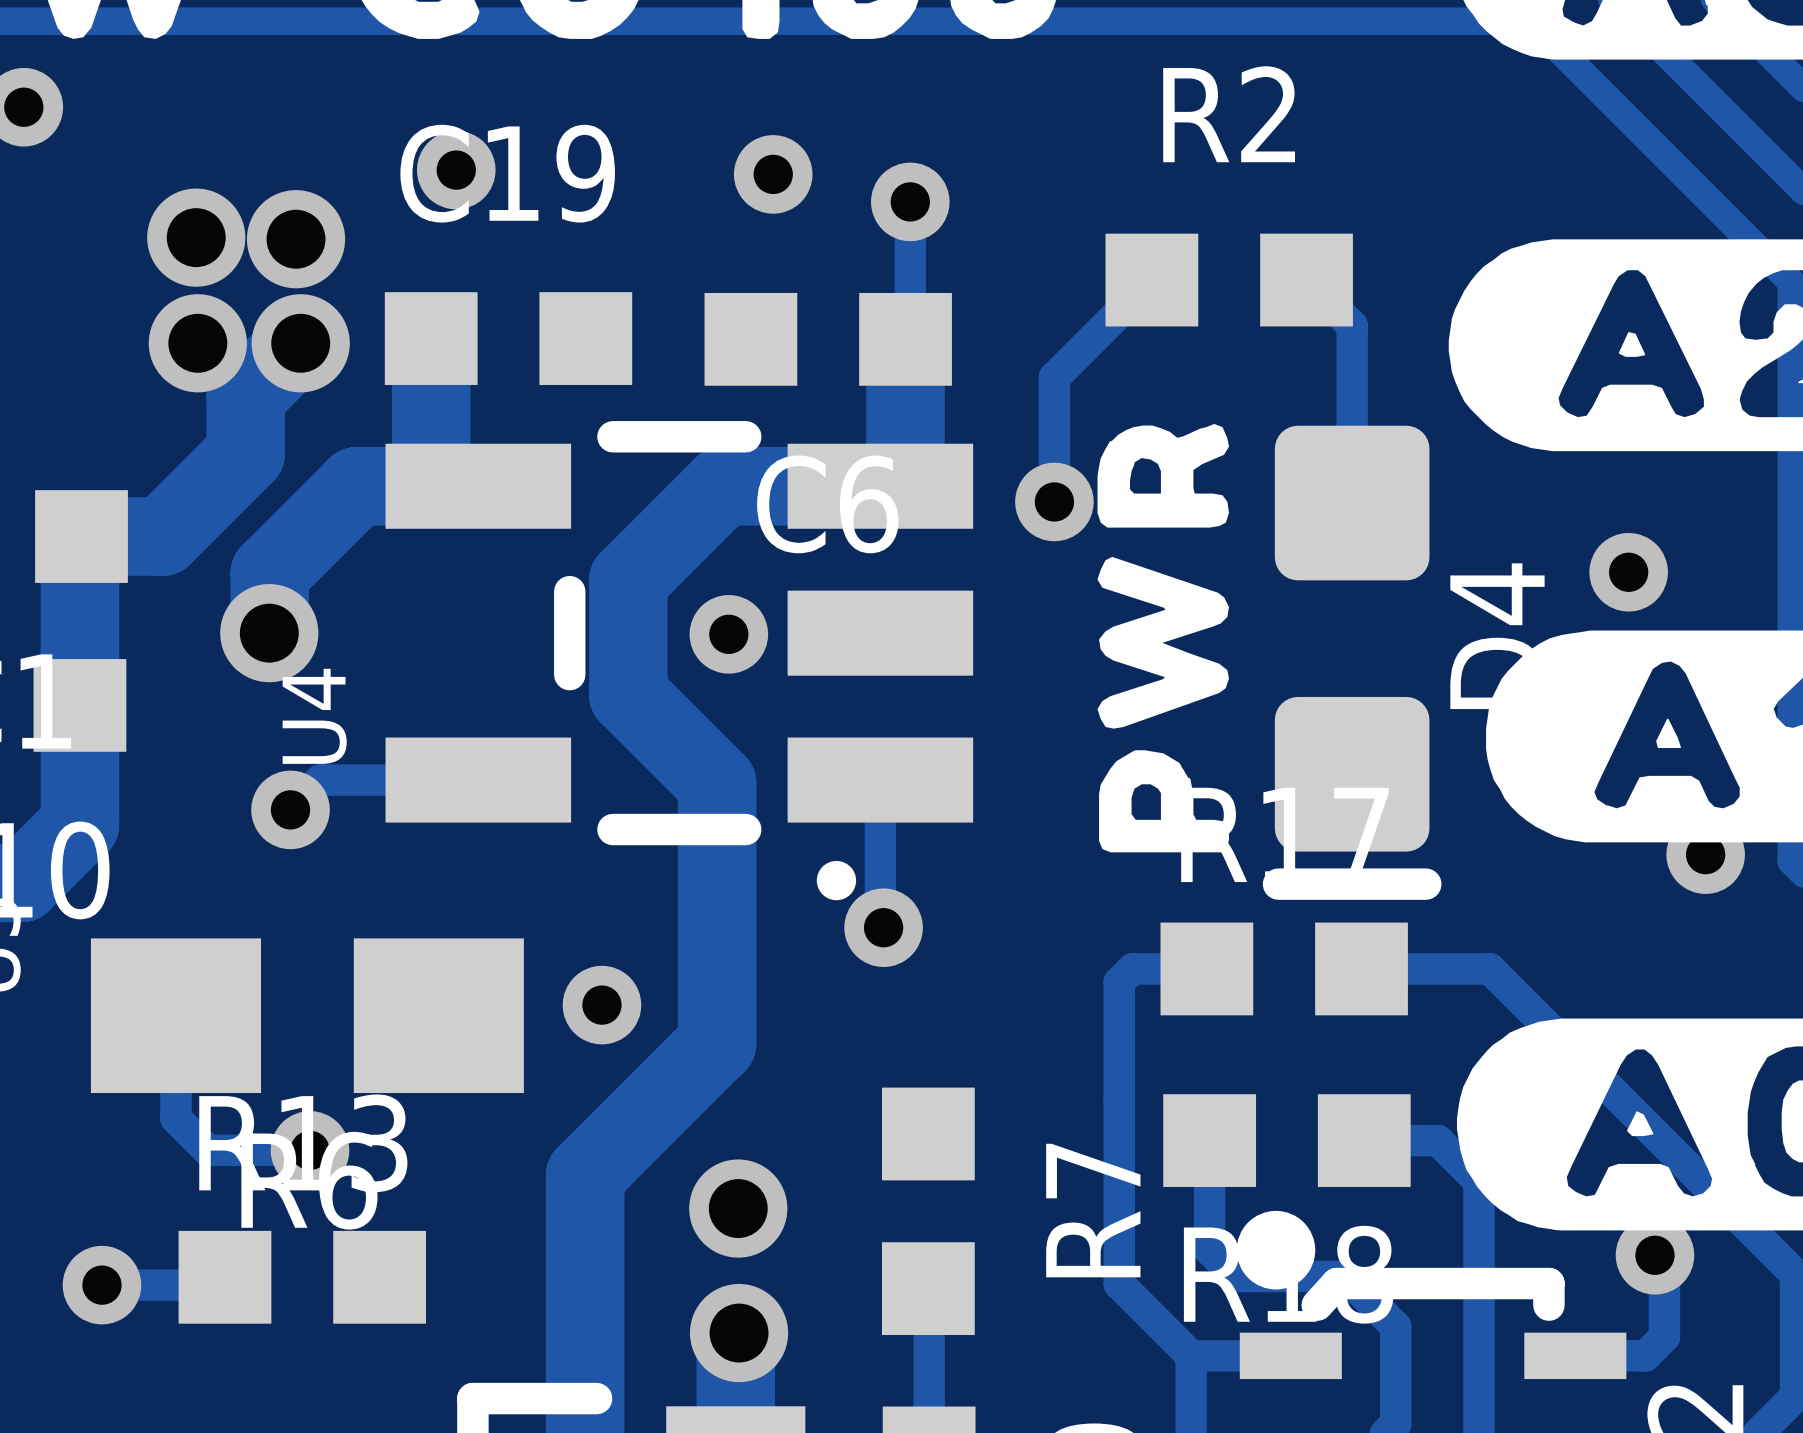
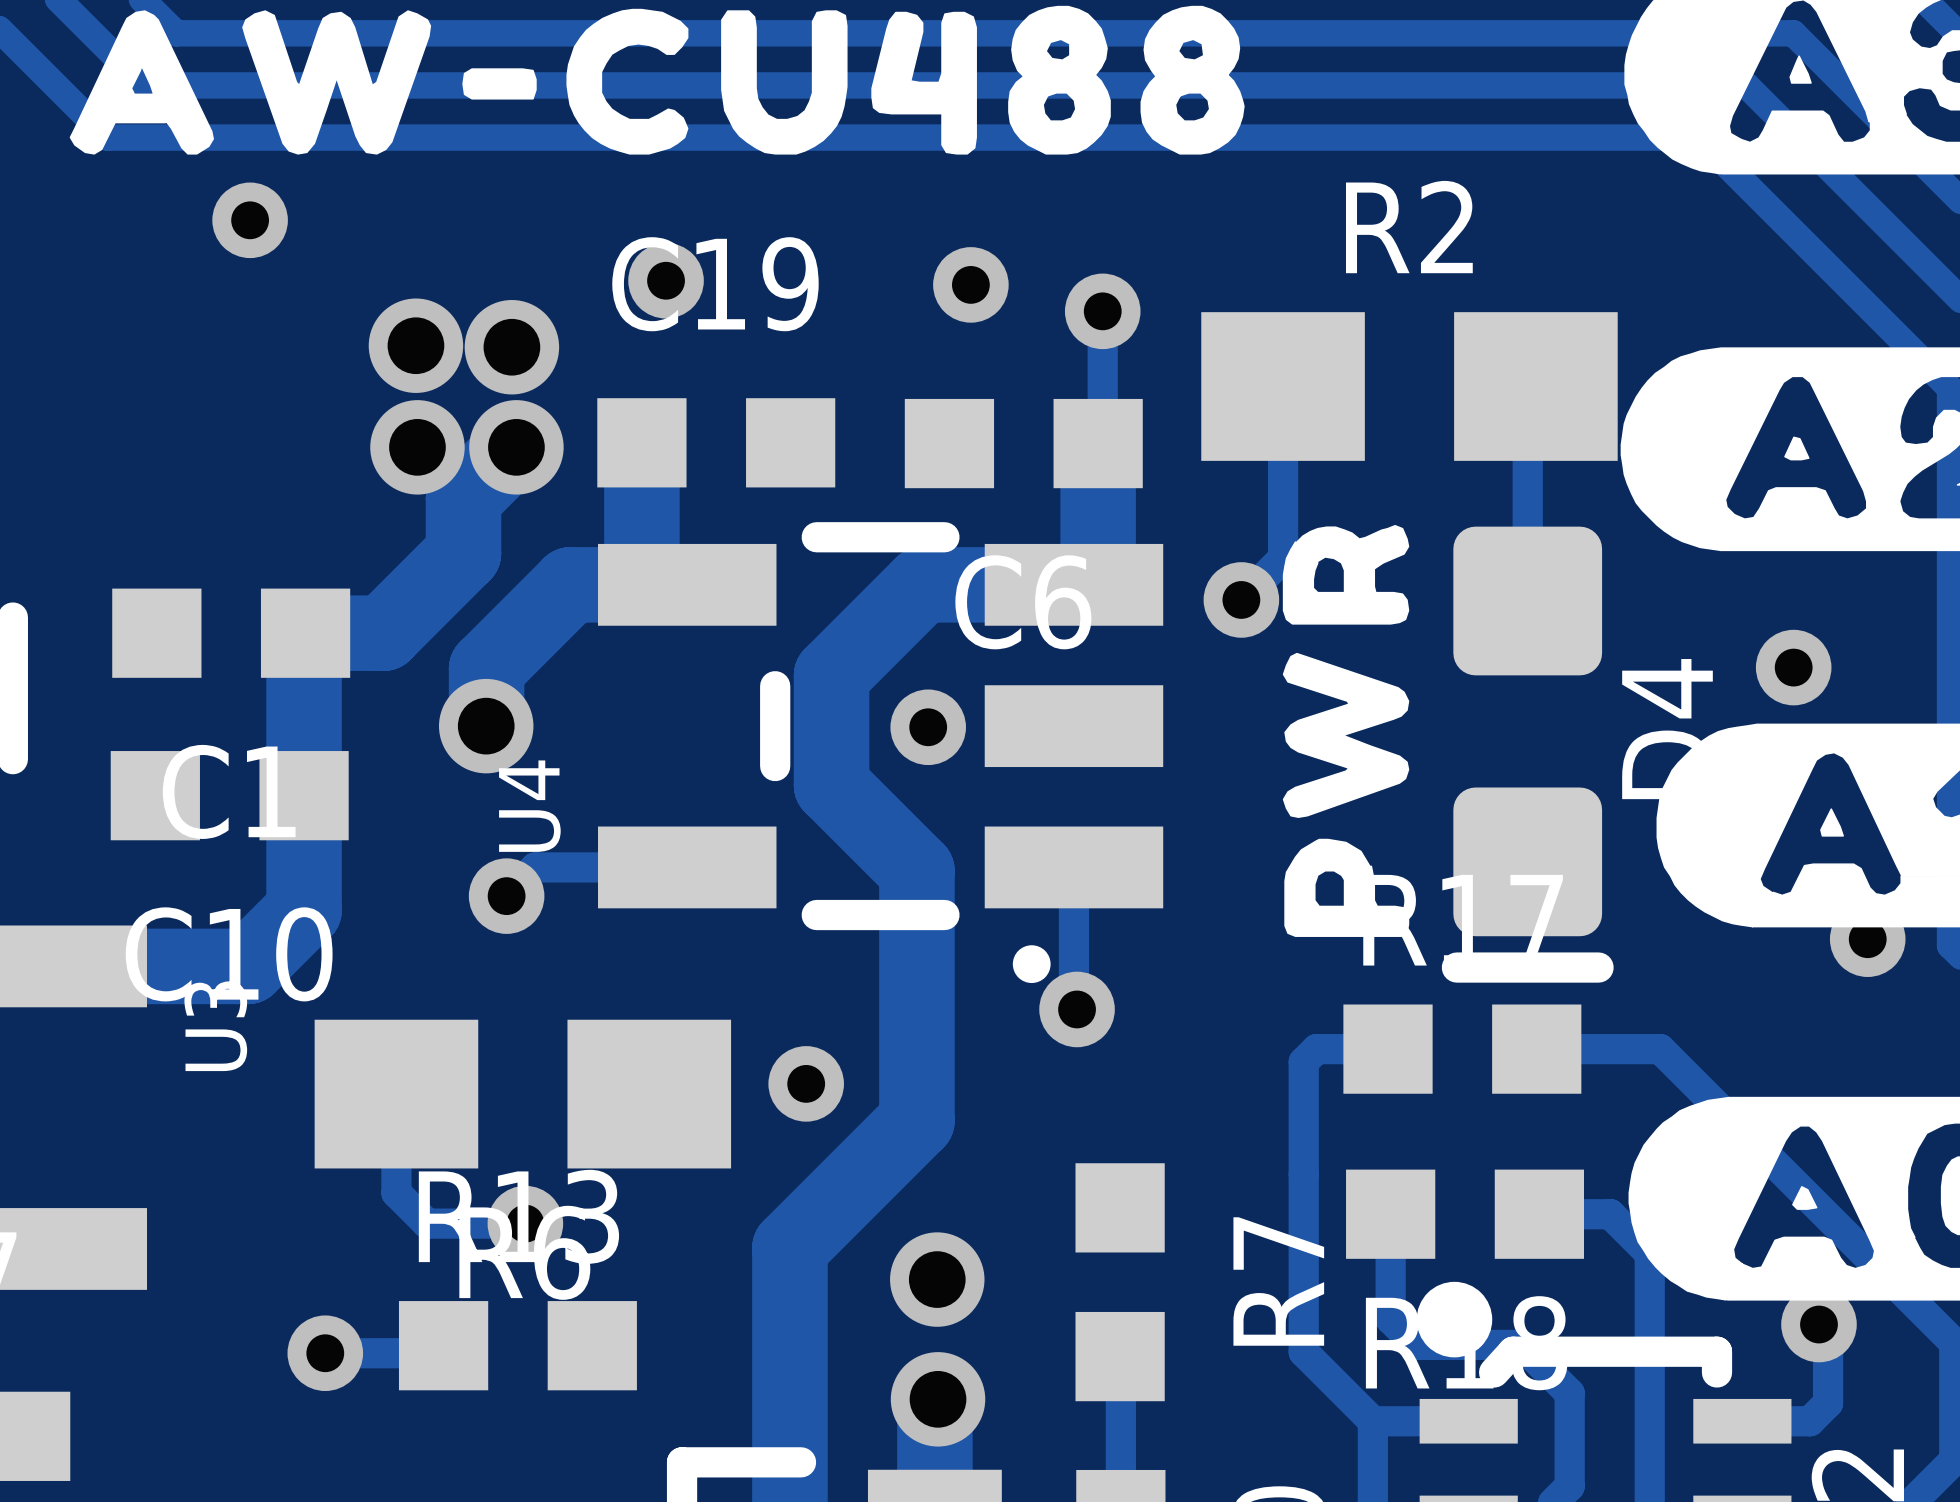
R2 footprint: [1105, 233, 1353, 327] -> [1201, 312, 1618, 461]
track: (1151, 280) (1054, 377) (1054, 501) -> (1283, 386) (1283, 558) (1241, 599)

